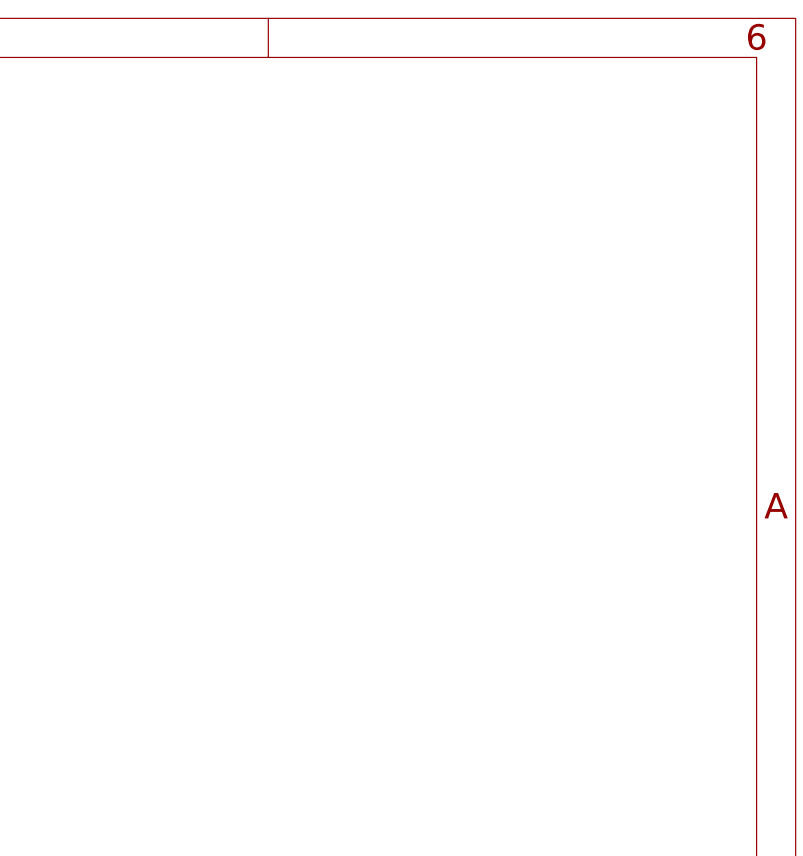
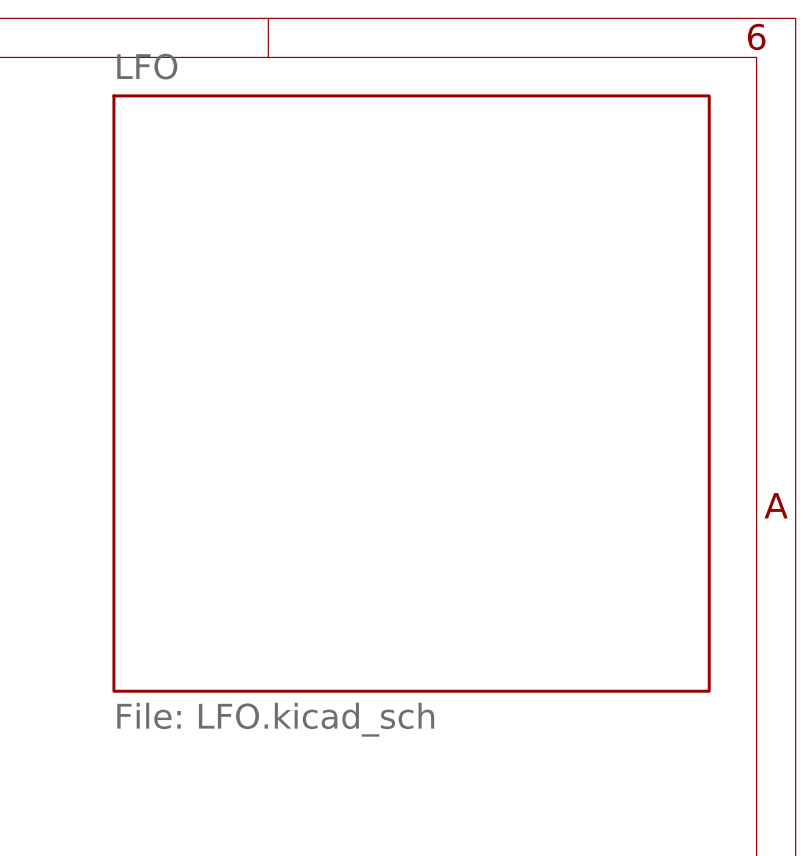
sheet LFO: none -> File: LFO.kicad_sch (411, 393)

